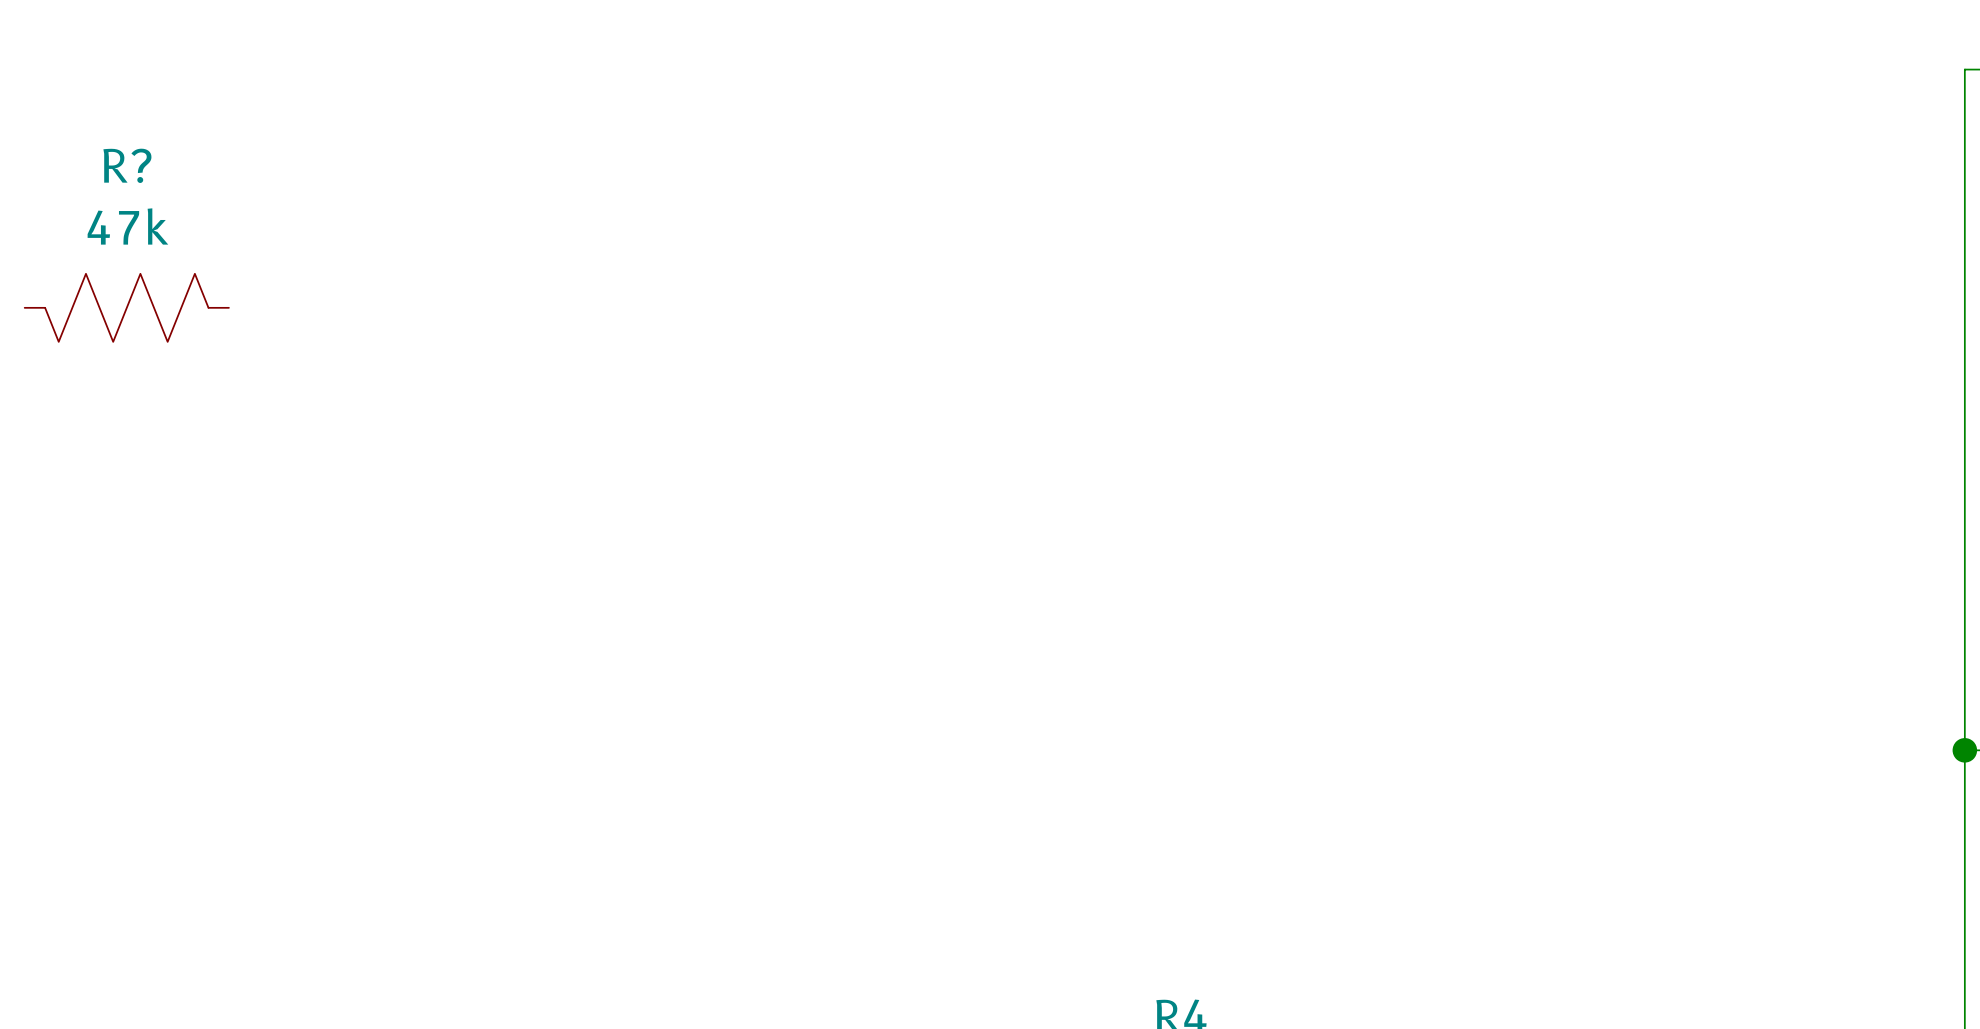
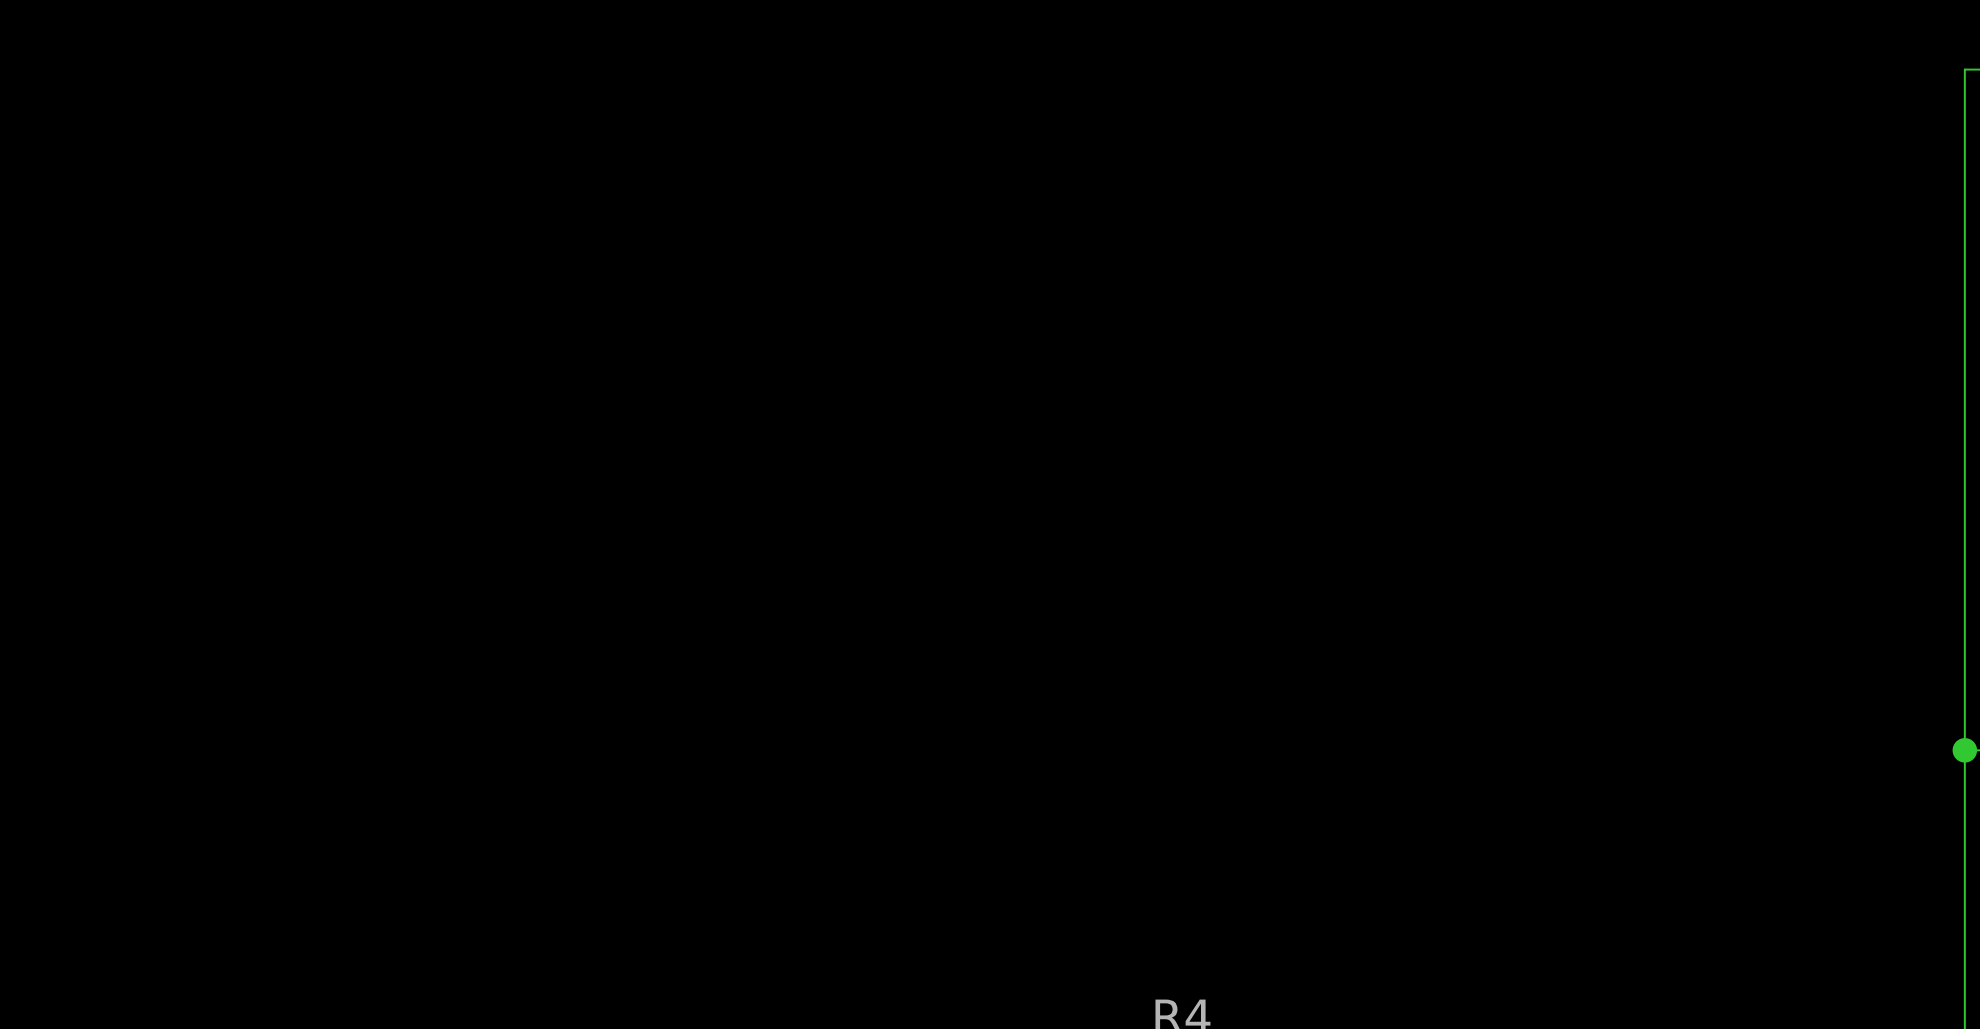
R?: 47k (126, 307) -> none

